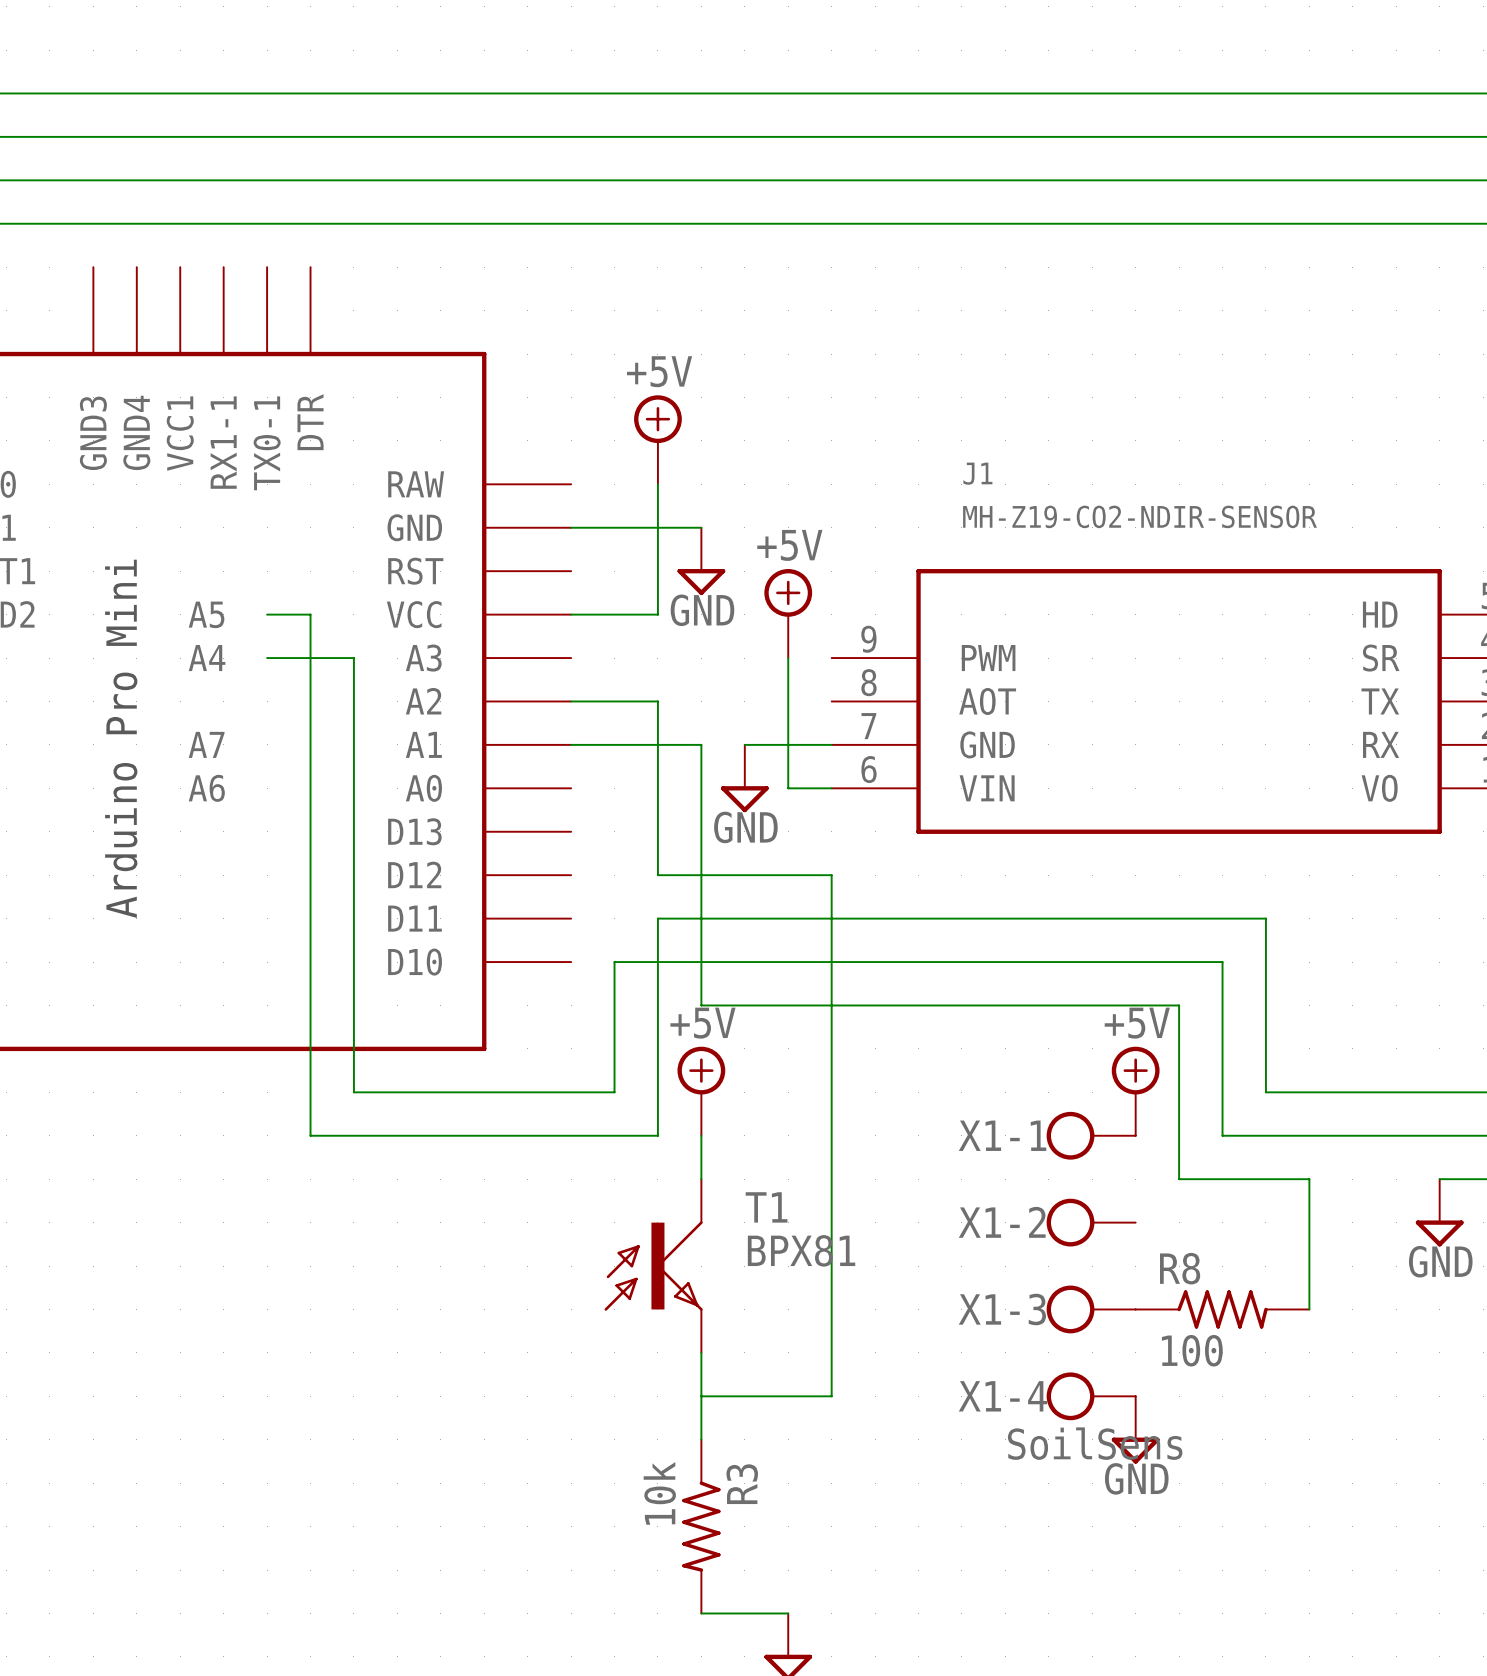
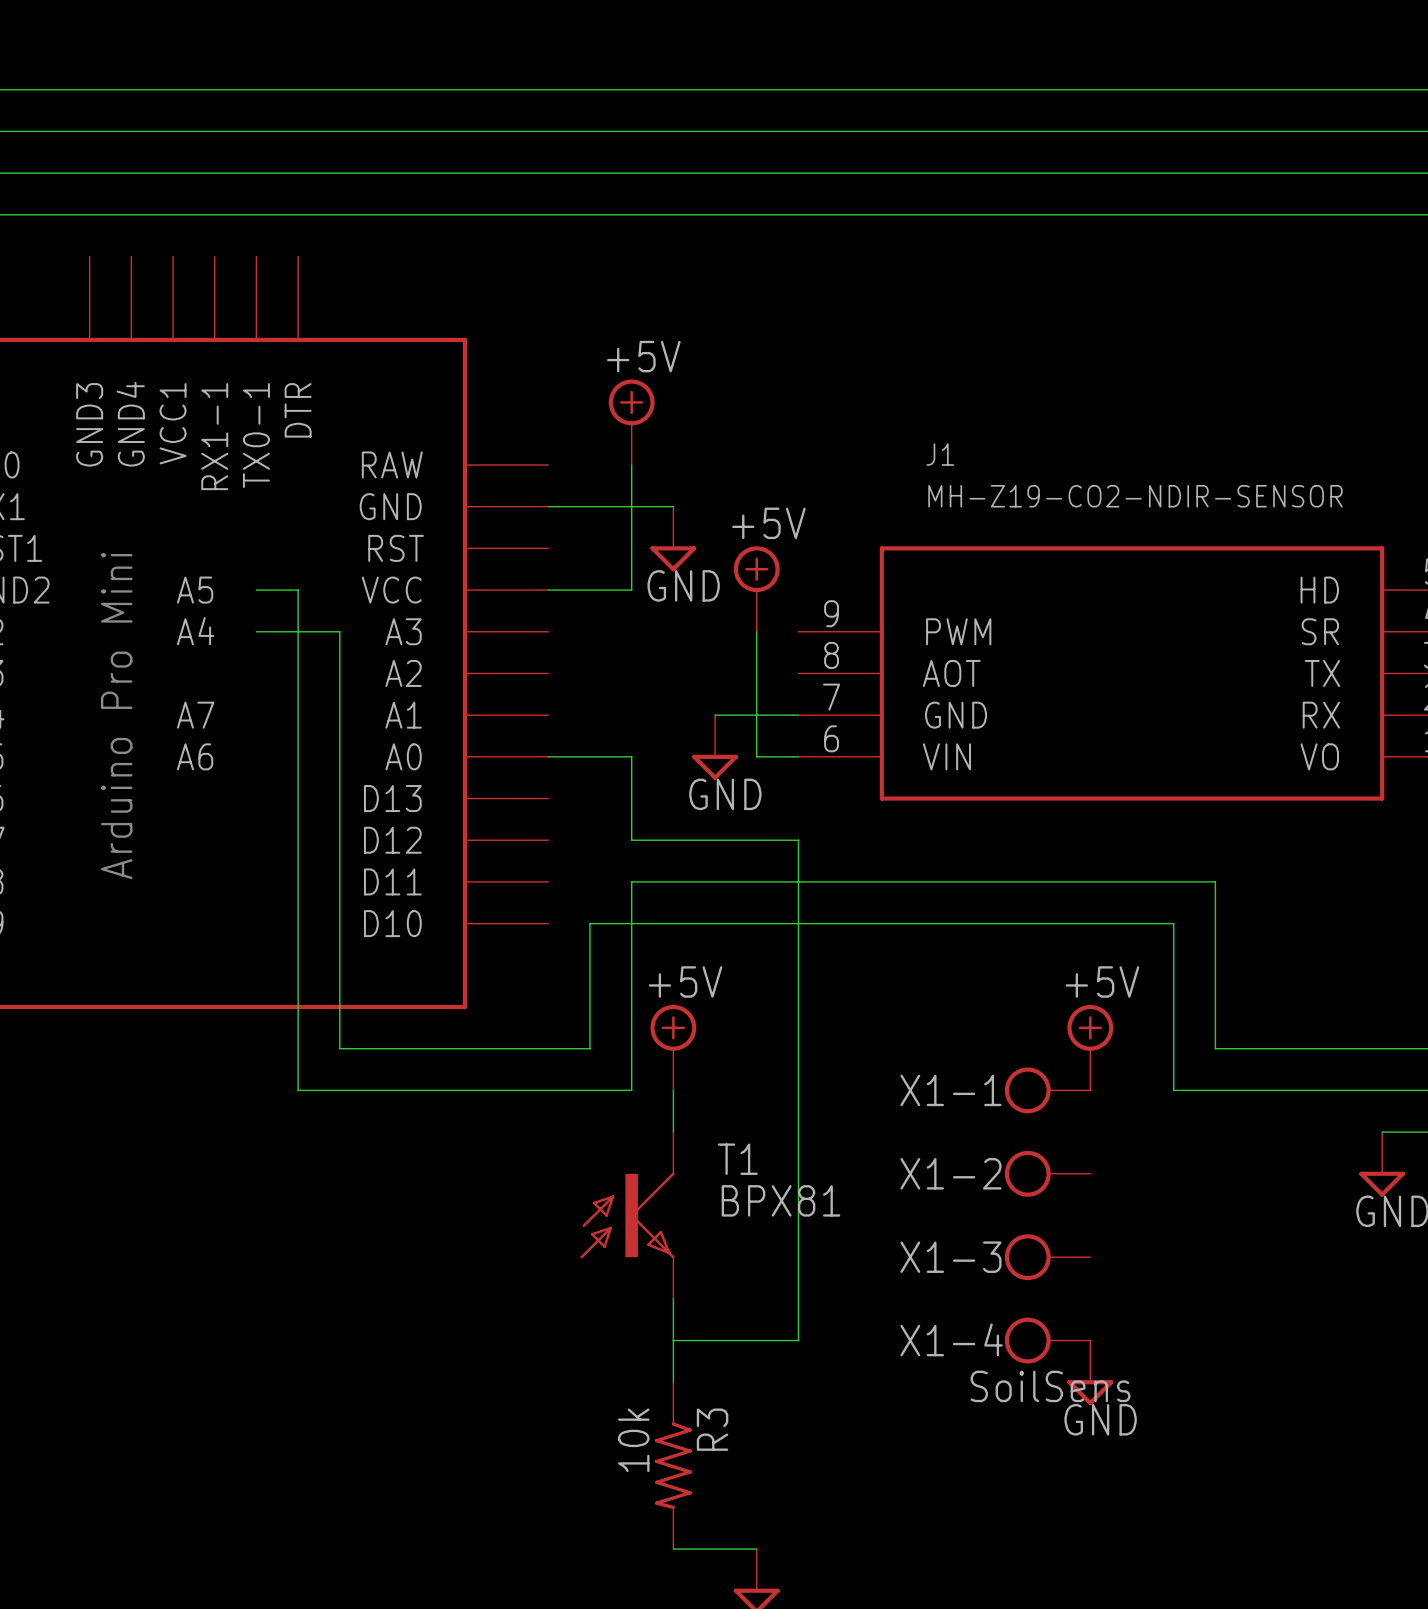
wire: (571, 701) (657, 701) (657, 788) -> (548, 756) (631, 756)
wire: (571, 744) (701, 744) (701, 1005) (1179, 1005) (1179, 1179) (1309, 1179) (1309, 1309) -> none
R8: 100 (1222, 1309) -> none

